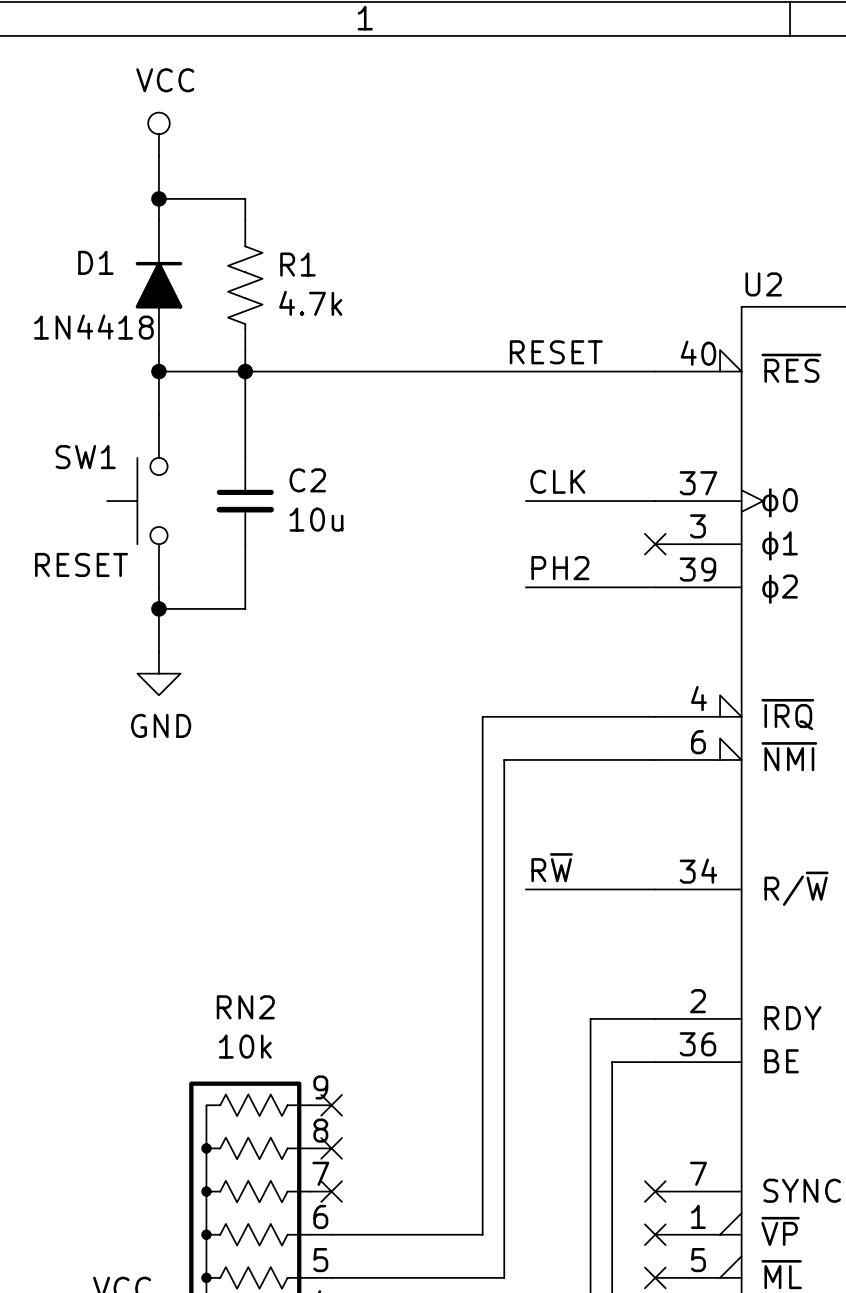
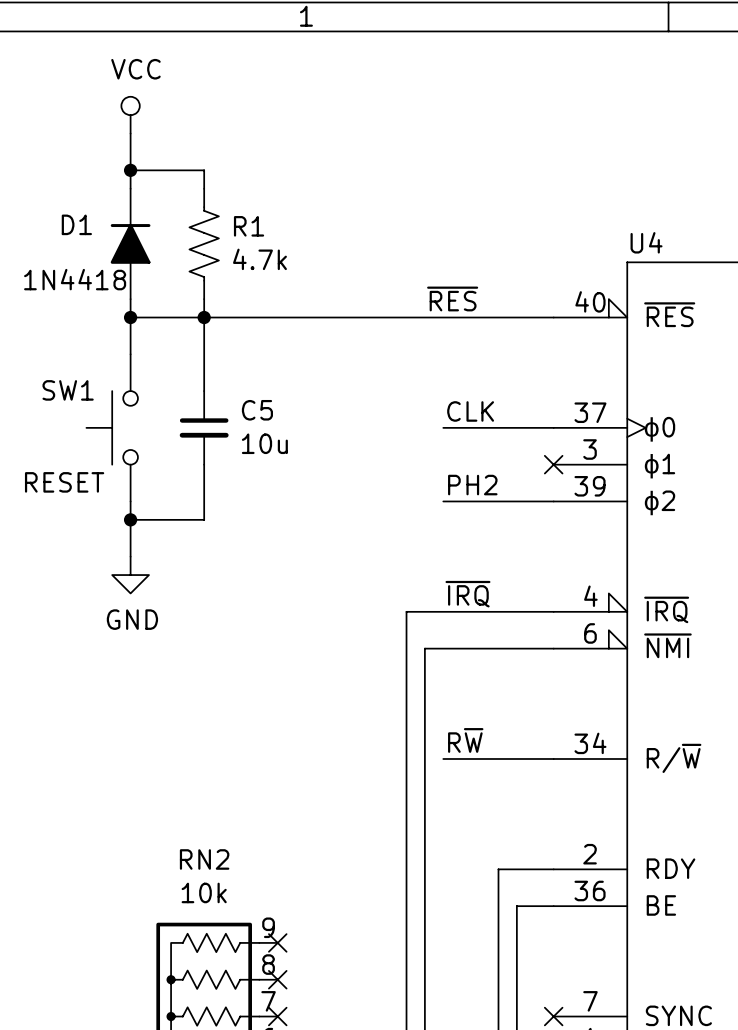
U2 name: U2 (763, 284) -> U4 (646, 242)
label: RESET (556, 352) -> ~{RES} (452, 298)
C2 name: C2 (307, 480) -> C5 (257, 410)
label: none -> ~{IRQ} (467, 594)

